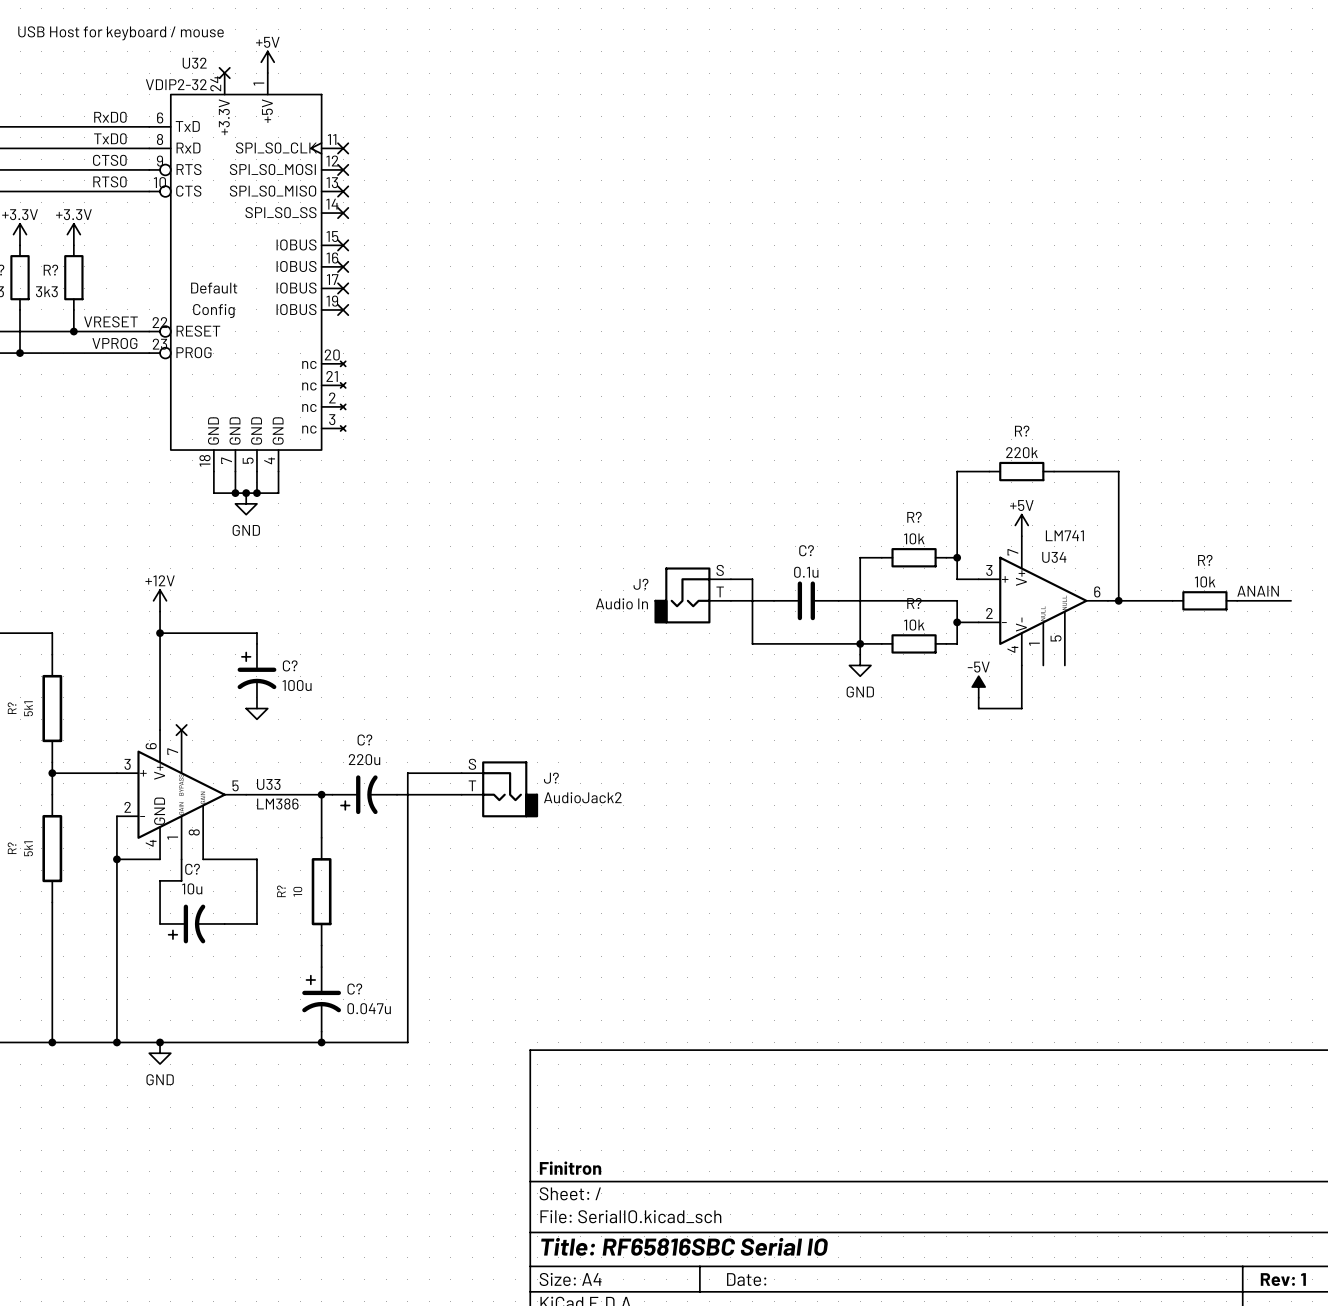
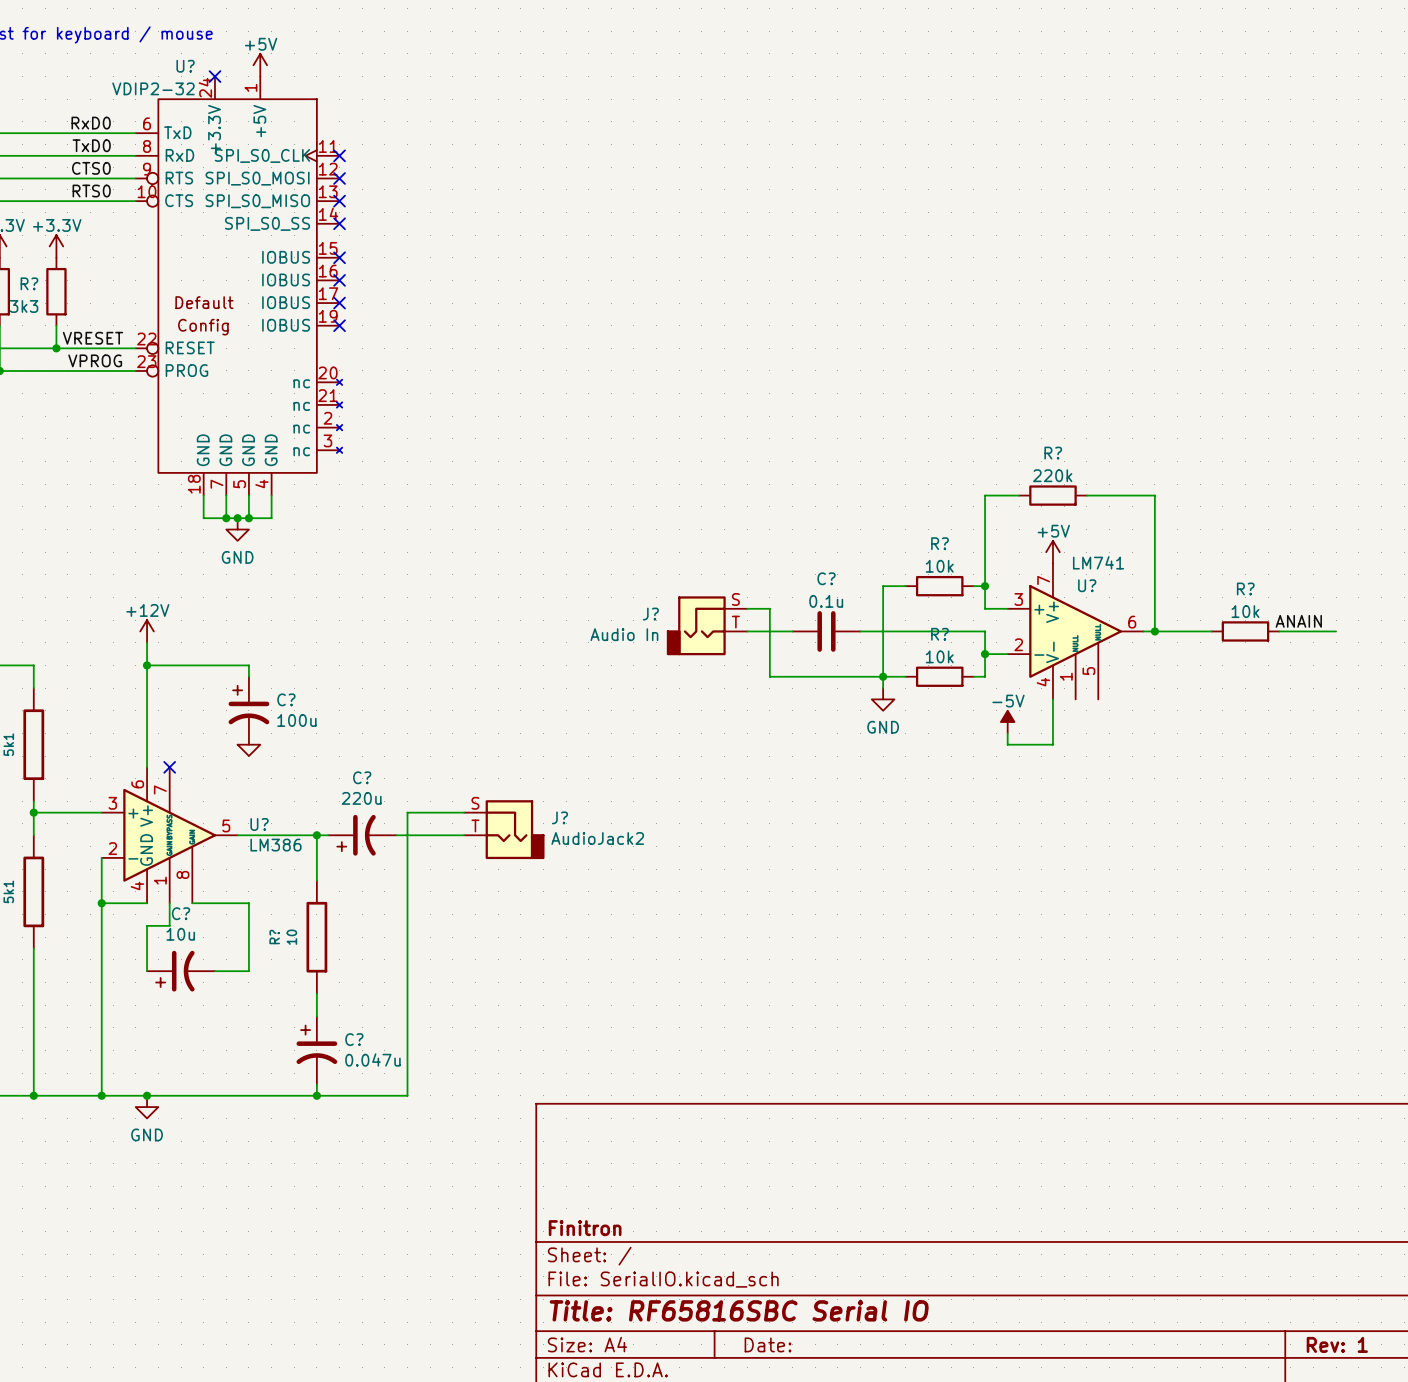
U32 name: U32 (194, 63) -> U? (185, 66)
U34 name: U34 (1054, 557) -> U? (1087, 585)
U33 name: U33 (268, 784) -> U? (259, 824)

